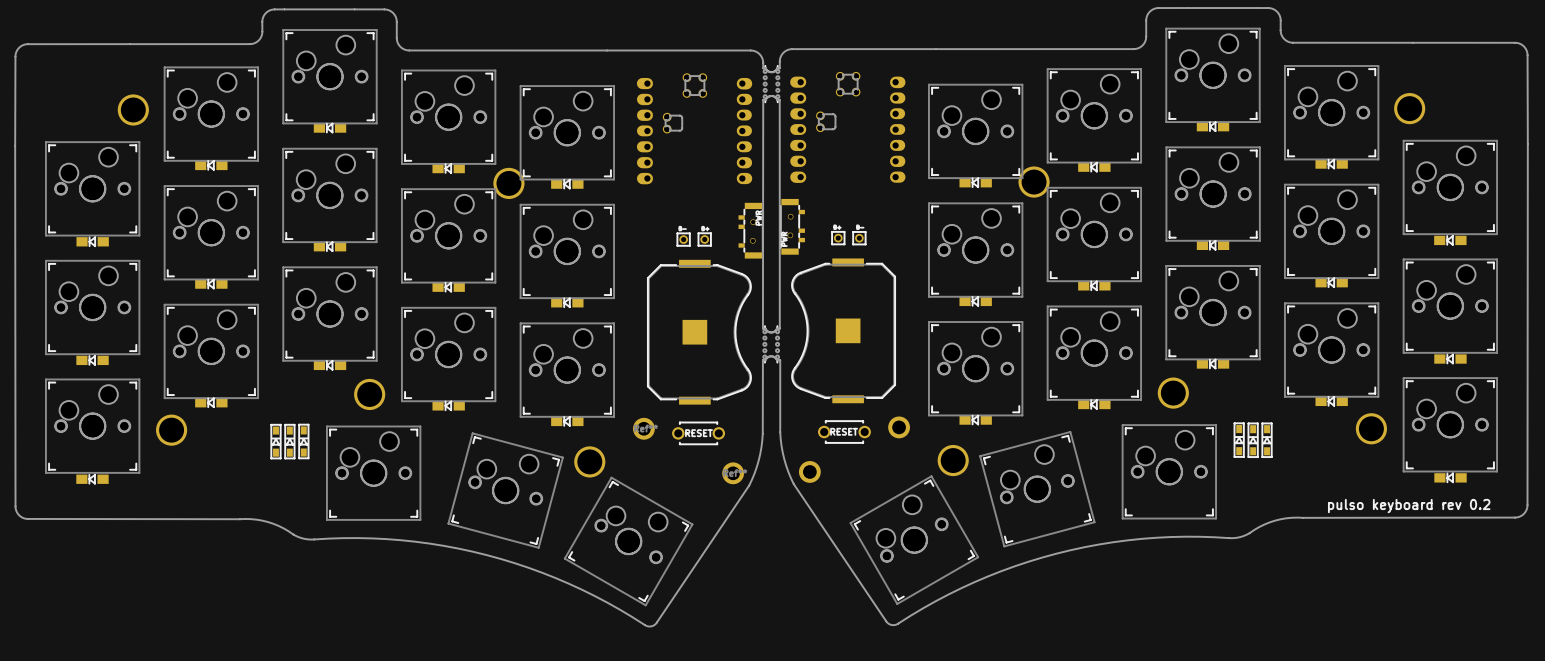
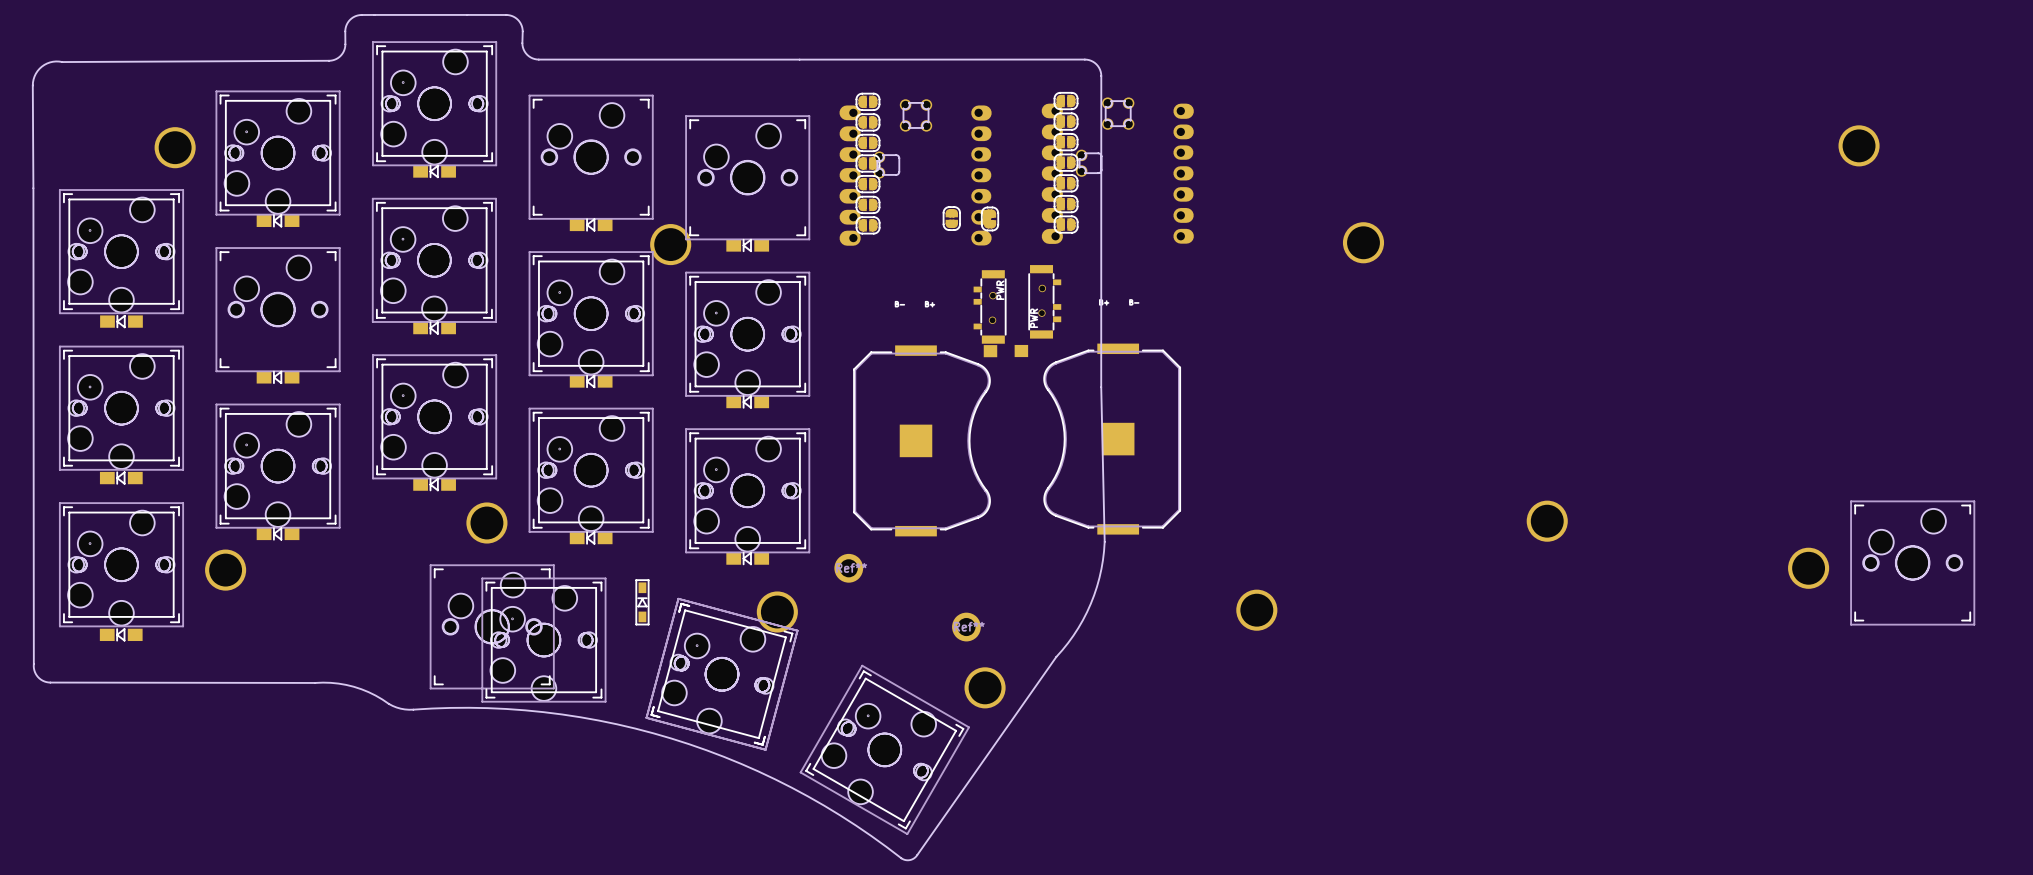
board edge: (396, 21) (397, 42) (401, 47) (407, 50) (752, 50) (761, 56) (763, 68) (771, 72) (779, 68) (780, 58) (783, 52) (792, 49) (1135, 49) (1141, 46) (1145, 40) (1148, 13) (1153, 9) (1158, 8) (1271, 8) (1277, 11) (1280, 16) (1282, 36) (1291, 42) (1520, 44) (1525, 48) (1527, 55) (1526, 510) (1521, 515) (1515, 517) (1291, 517) (1269, 522) (1246, 534) (1236, 537) (1170, 537) (1098, 544) (1056, 553) (1001, 571) (961, 588) (897, 624) (891, 624) (886, 621) (790, 477) (784, 458) (780, 439) (780, 360) (771, 356) (762, 360) (762, 440) (758, 460) (752, 479) (656, 622) (651, 626) (645, 625) (581, 589) (541, 572) (486, 555) (444, 545) (372, 538) (306, 539) (296, 536) (273, 523) (251, 519) (22, 517) (17, 513) (15, 506) (16, 51) (21, 46) (27, 44) (249, 44) -> (522, 31) (524, 51) (530, 57) (536, 59) (1084, 59) (1093, 61) (1100, 69) (1101, 387) (1104, 541) (1099, 577) (1087, 612) (1073, 635) (912, 859) (902, 858) (840, 815) (758, 771) (688, 744) (617, 724) (562, 714) (506, 708) (404, 709) (392, 705) (361, 689) (330, 682) (50, 682) (42, 680) (36, 675) (33, 666) (32, 85) (34, 76) (41, 66) (56, 61) (328, 60)
part footprint: [282, 29, 378, 124] -> [372, 41, 497, 166]
part footprint: [164, 66, 259, 162] -> [215, 90, 341, 216]
part: none -> (1066, 101)
part: none -> (867, 101)
part: (1213, 75) -> none
part: (771, 84) -> none
part: none -> (867, 122)
part: none -> (1066, 121)
part: none -> (1066, 142)
part: none -> (867, 142)
part: (1331, 112) -> none
part: (1094, 115) -> none
part: none -> (867, 163)
part: none -> (1066, 162)
part: (1213, 126) -> none
part: (975, 131) -> none
part: none -> (1066, 183)
part: none -> (867, 184)
part footprint: [45, 141, 140, 237] -> [59, 189, 184, 314]
part footprint: [282, 148, 378, 243] -> [372, 198, 497, 323]
part: none -> (1066, 204)
part: none -> (867, 204)
part: none -> (951, 218)
part: none -> (990, 218)
part: (1331, 164) -> none
part: (1094, 167) -> none
part: none -> (868, 225)
part: none -> (1066, 224)
part: (975, 182) -> none
part: (1450, 187) -> none
part footprint: [401, 188, 496, 284] -> [528, 251, 654, 376]
part: (1213, 194) -> none
part footprint: [520, 204, 615, 299] -> [685, 271, 810, 397]
part: (1331, 231) -> none
part: (1094, 234) -> none
part: (838, 238) -> none
part: (859, 238) -> none
part: (683, 239) -> none
part: (704, 239) -> none
part: (1450, 240) -> none
part: (1213, 245) -> none
part: (975, 250) -> none
part footprint: [45, 260, 140, 355] -> [59, 345, 184, 471]
part: none -> (990, 351)
part: none -> (1021, 351)
part footprint: [282, 266, 378, 362] -> [372, 354, 497, 480]
part: (1331, 282) -> none
part: (1094, 285) -> none
part: (975, 301) -> none
part footprint: [164, 304, 259, 399] -> [215, 403, 341, 529]
part: (1450, 306) -> none
part footprint: [401, 307, 496, 402] -> [528, 407, 654, 533]
part: (1213, 312) -> none
part footprint: [520, 322, 615, 418] -> [685, 428, 810, 554]
board edge: (779, 328) (779, 99) (771, 95) (763, 99) (762, 328) (771, 332) (779, 328) -> none
part: (771, 344) -> none
part: (1331, 350) -> none
part: (1094, 353) -> none
part: (1450, 359) -> none
part: (1213, 363) -> none
part: (975, 368) -> none
part footprint: [45, 378, 140, 474] -> [59, 502, 184, 628]
part: (1331, 401) -> none
part: (1094, 404) -> none
part: (975, 420) -> none
part: (899, 427) -> none
part: (844, 432) -> none
part: (698, 433) -> none
part: (1239, 440) -> none
part: (1253, 440) -> none
part: (1267, 440) -> none
part: (275, 441) -> none
part: (289, 441) -> none
part: (303, 441) -> none
part: none -> (642, 602)
part: (809, 471) -> none
part: (1169, 471) -> none
part: (1450, 477) -> none
part: none -> (543, 640)
part: (1037, 489) -> none
part: (505, 490) -> none
text: pulso keyboard rev 0.2 (1409, 506) -> none
part: none -> (722, 674)
part: none -> (985, 687)
part: (914, 540) -> none
part: (628, 541) -> none
part: none -> (884, 749)

